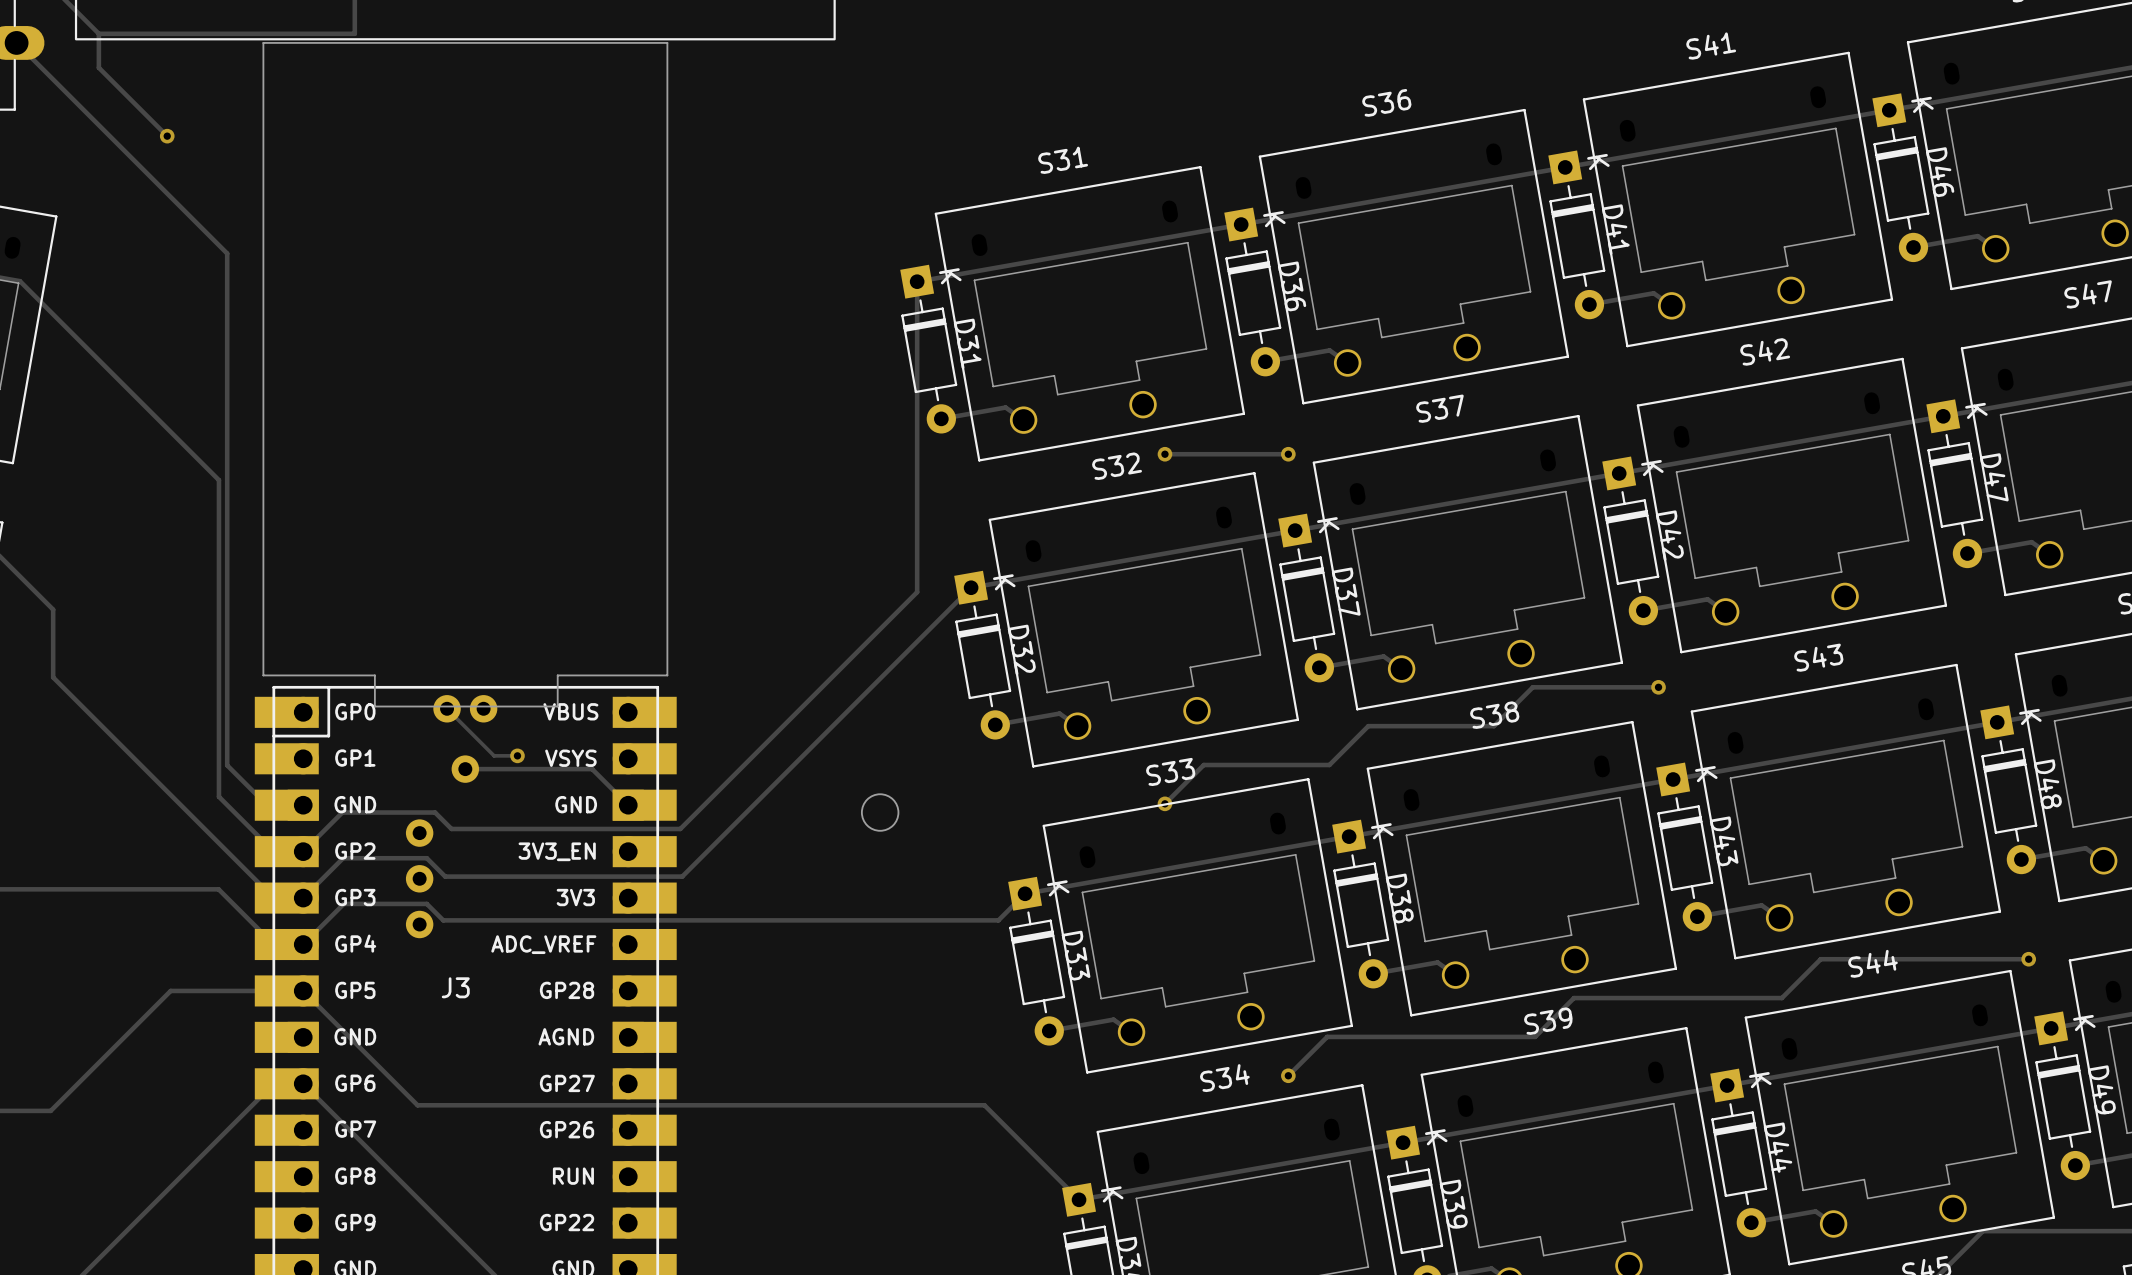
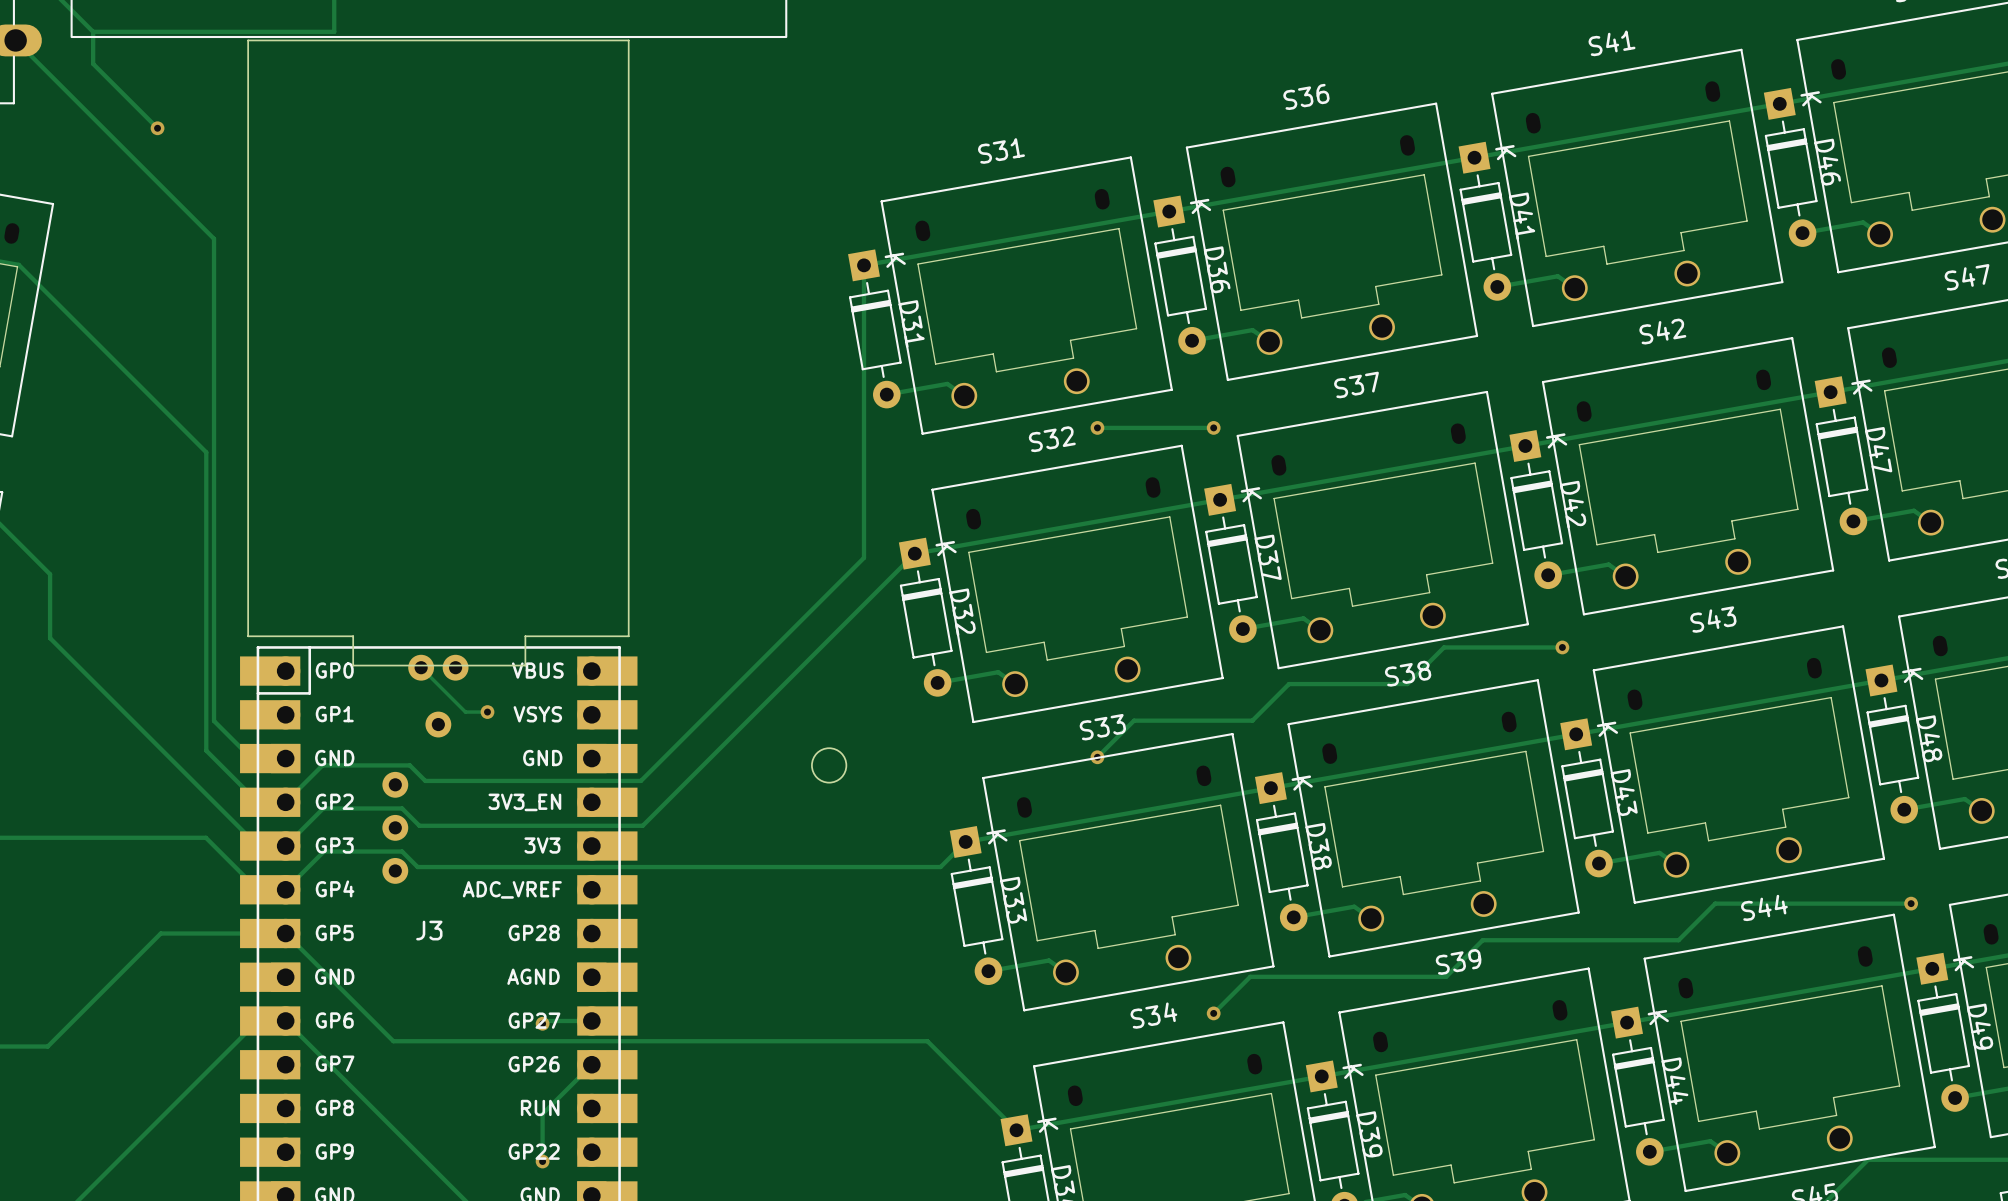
track: (465, 769) (592, 769) (628, 805) -> none
track: none -> (591, 1020) (545, 1020) (542, 1023)
via: none -> (542, 1023)
track: none -> (591, 1064) (542, 1113) (542, 1161)
via: none -> (542, 1161)

